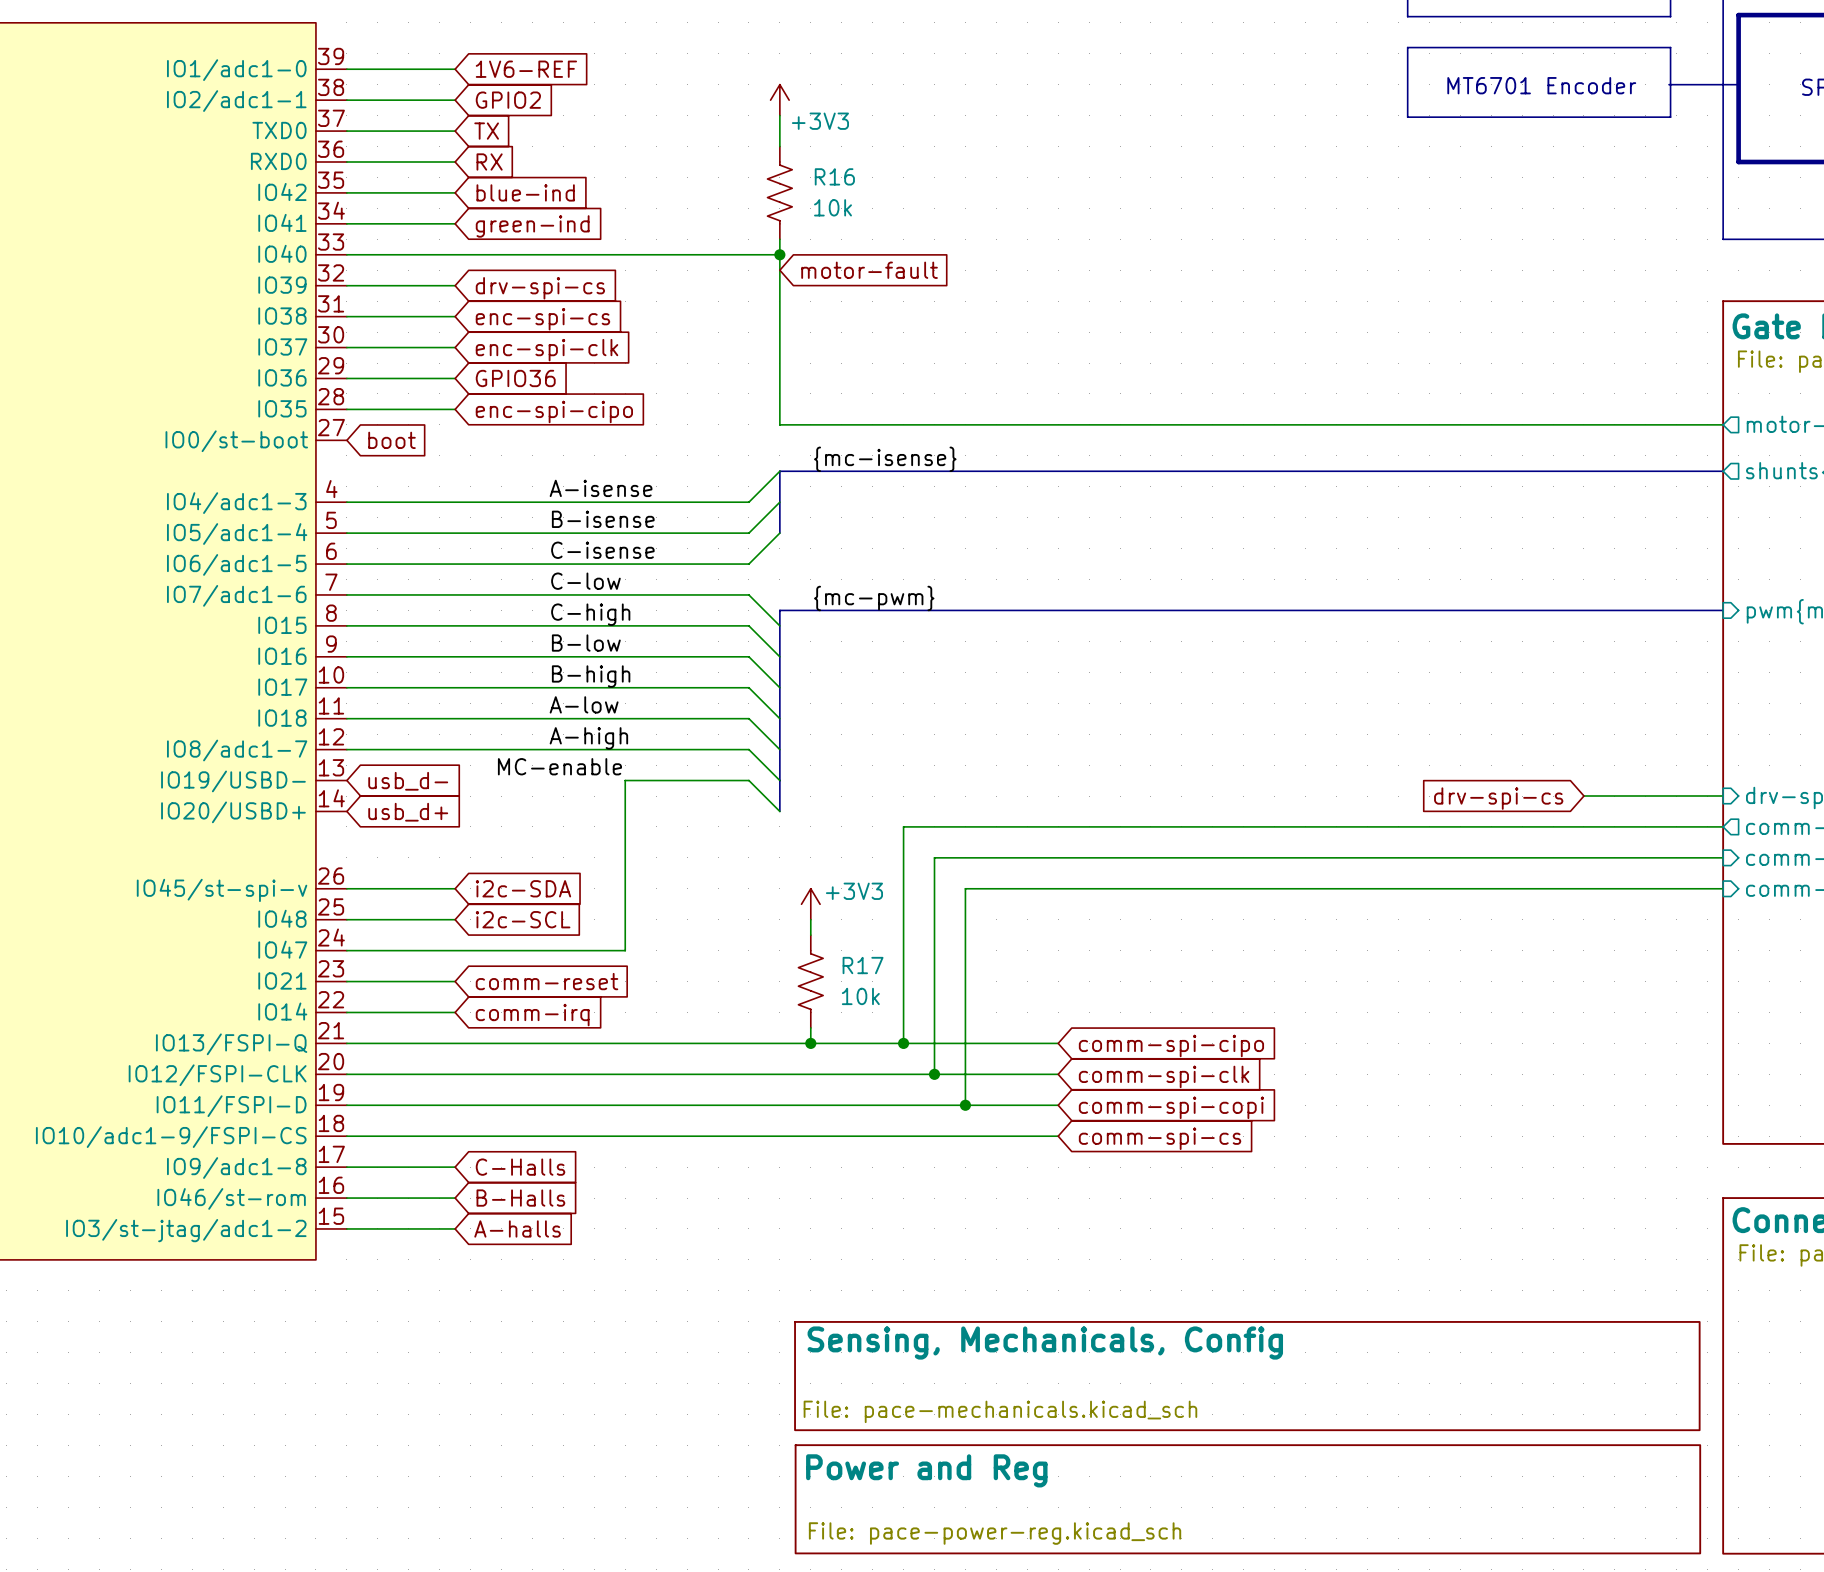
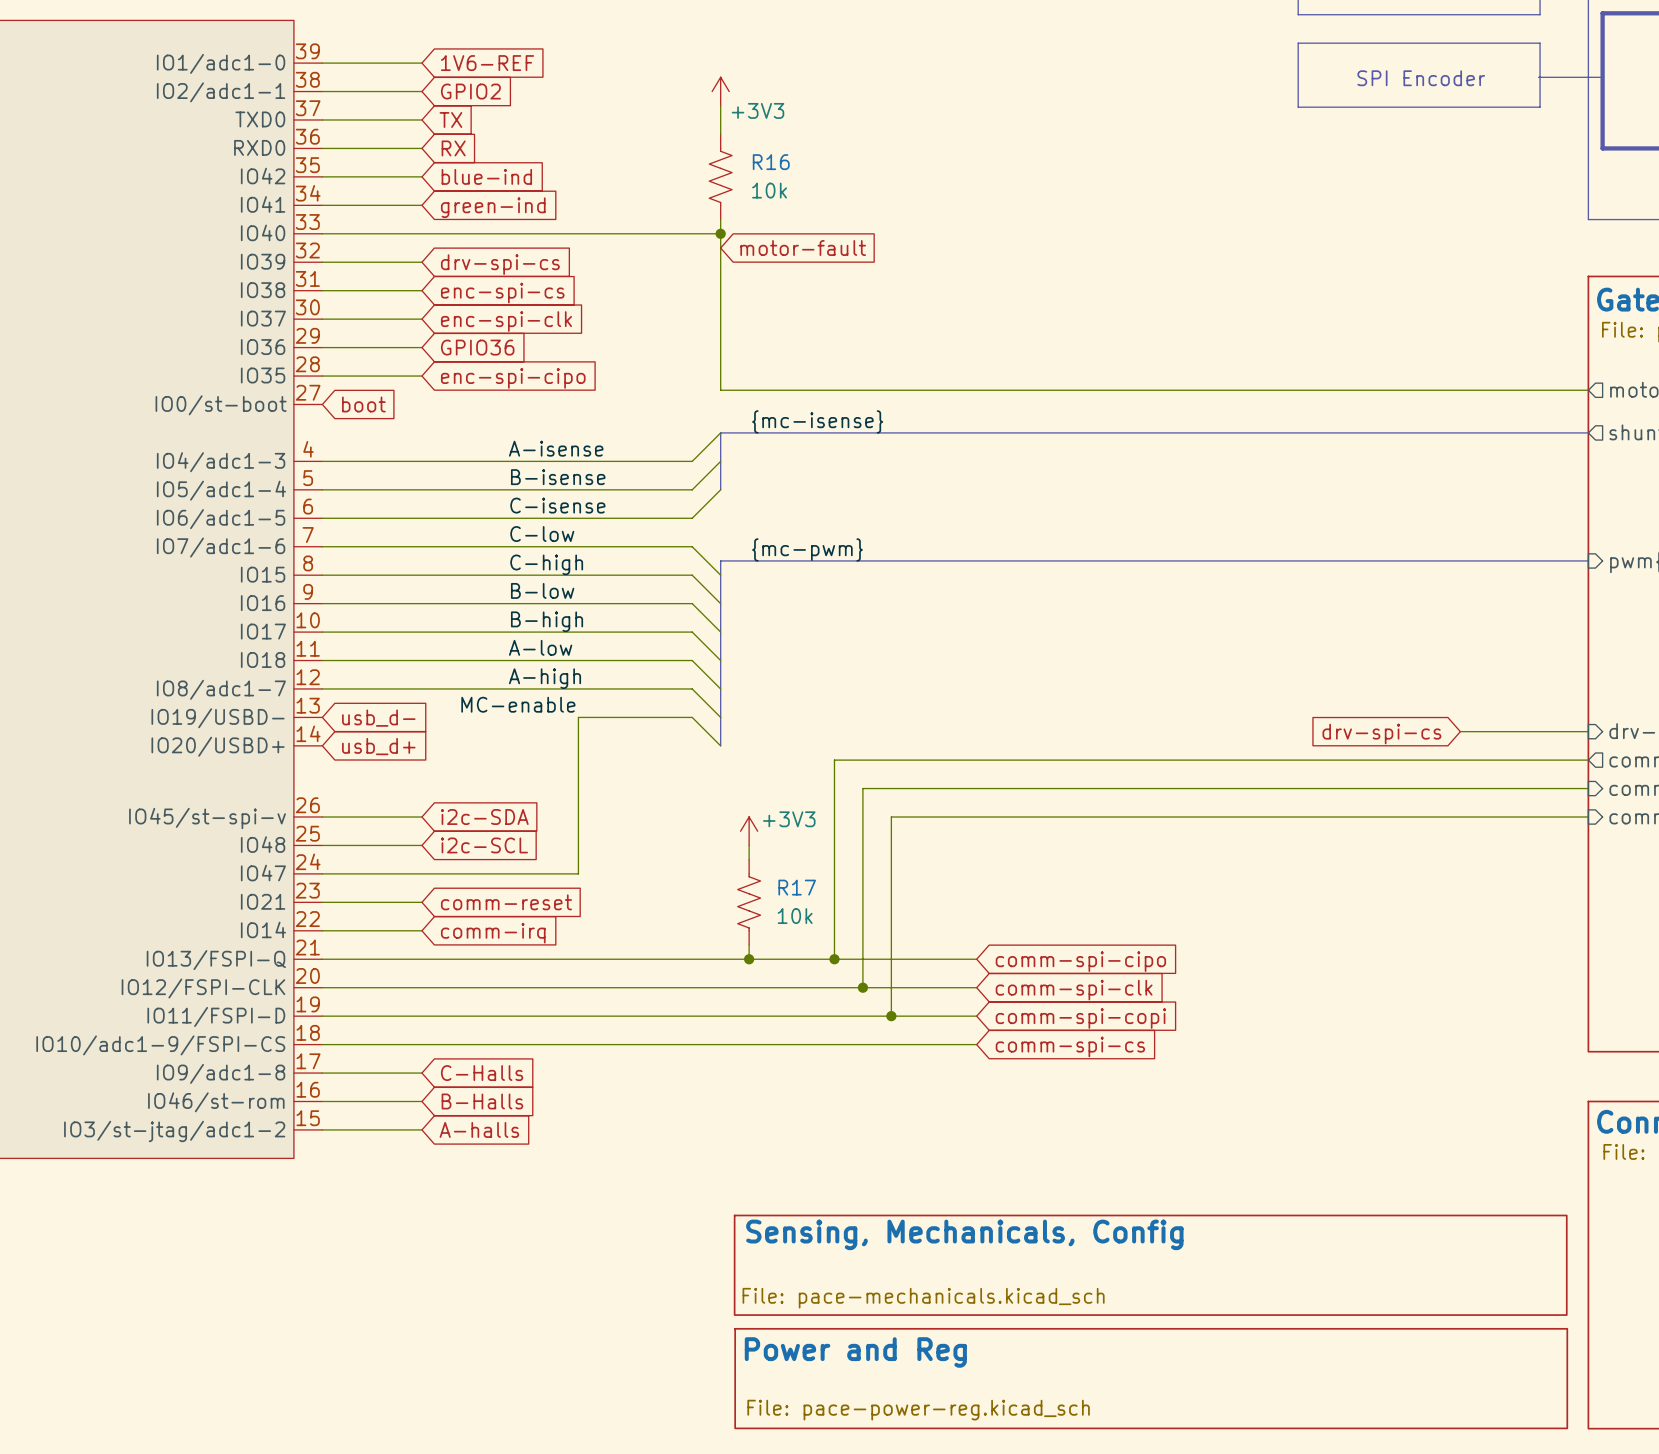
text: MT6701 Encoder (1541, 85) -> SPI Encoder (1421, 78)

